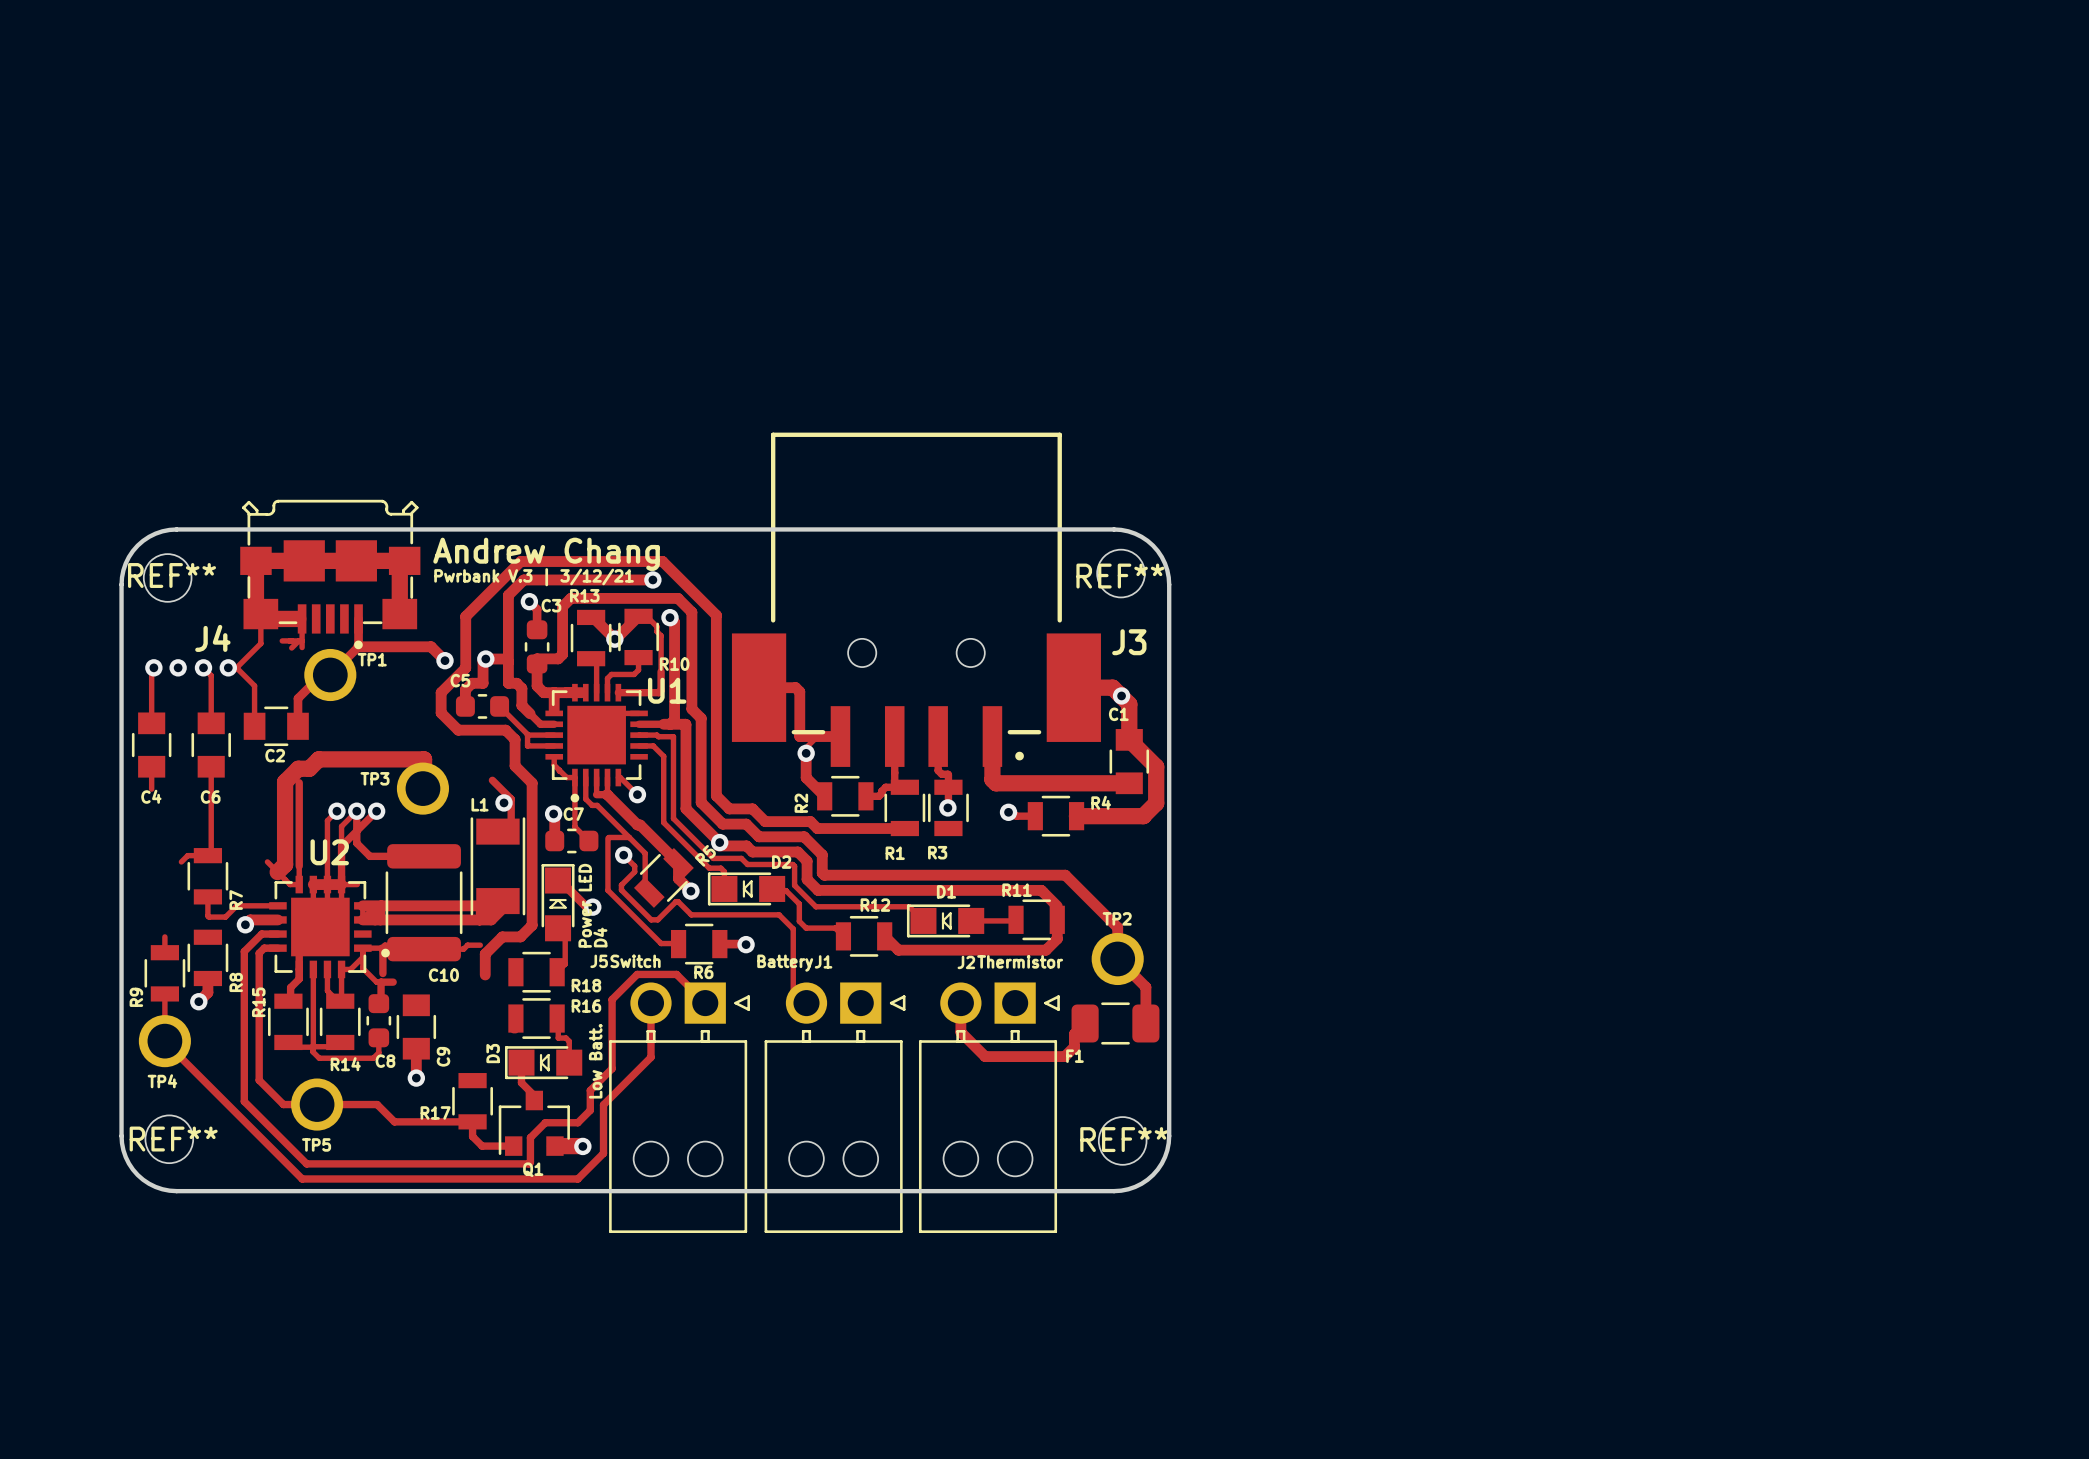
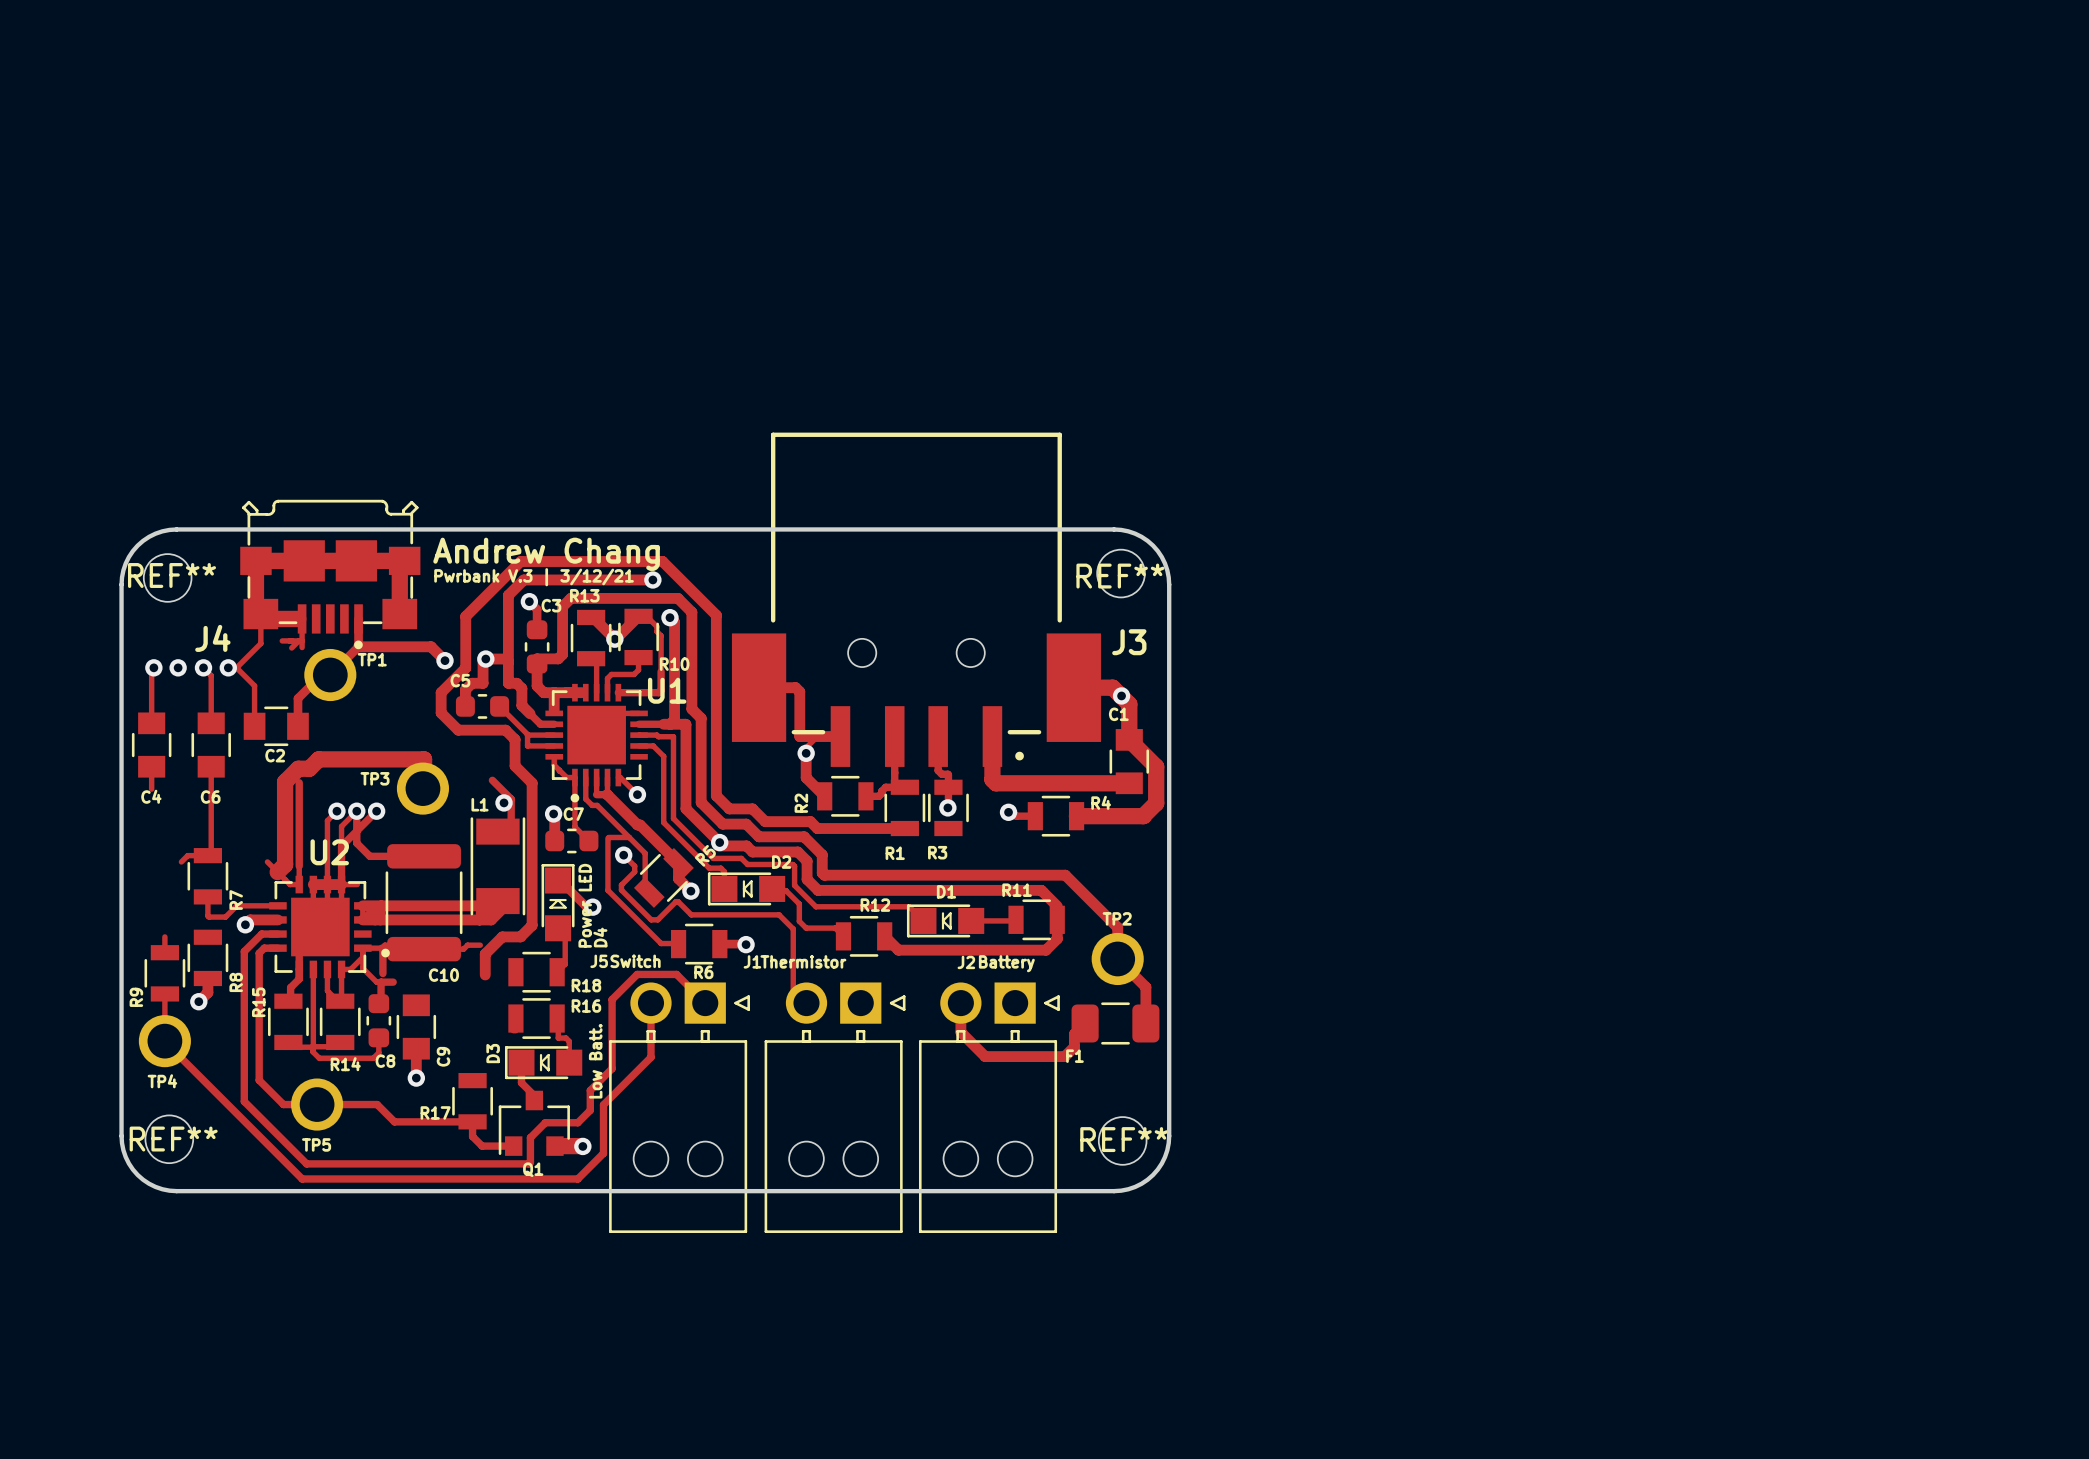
J1 name position: J1 (823, 961) -> J1 (752, 961)
text: Thermistor (1020, 961) -> Battery (1006, 963)
text: Battery (785, 963) -> Thermistor (803, 961)

